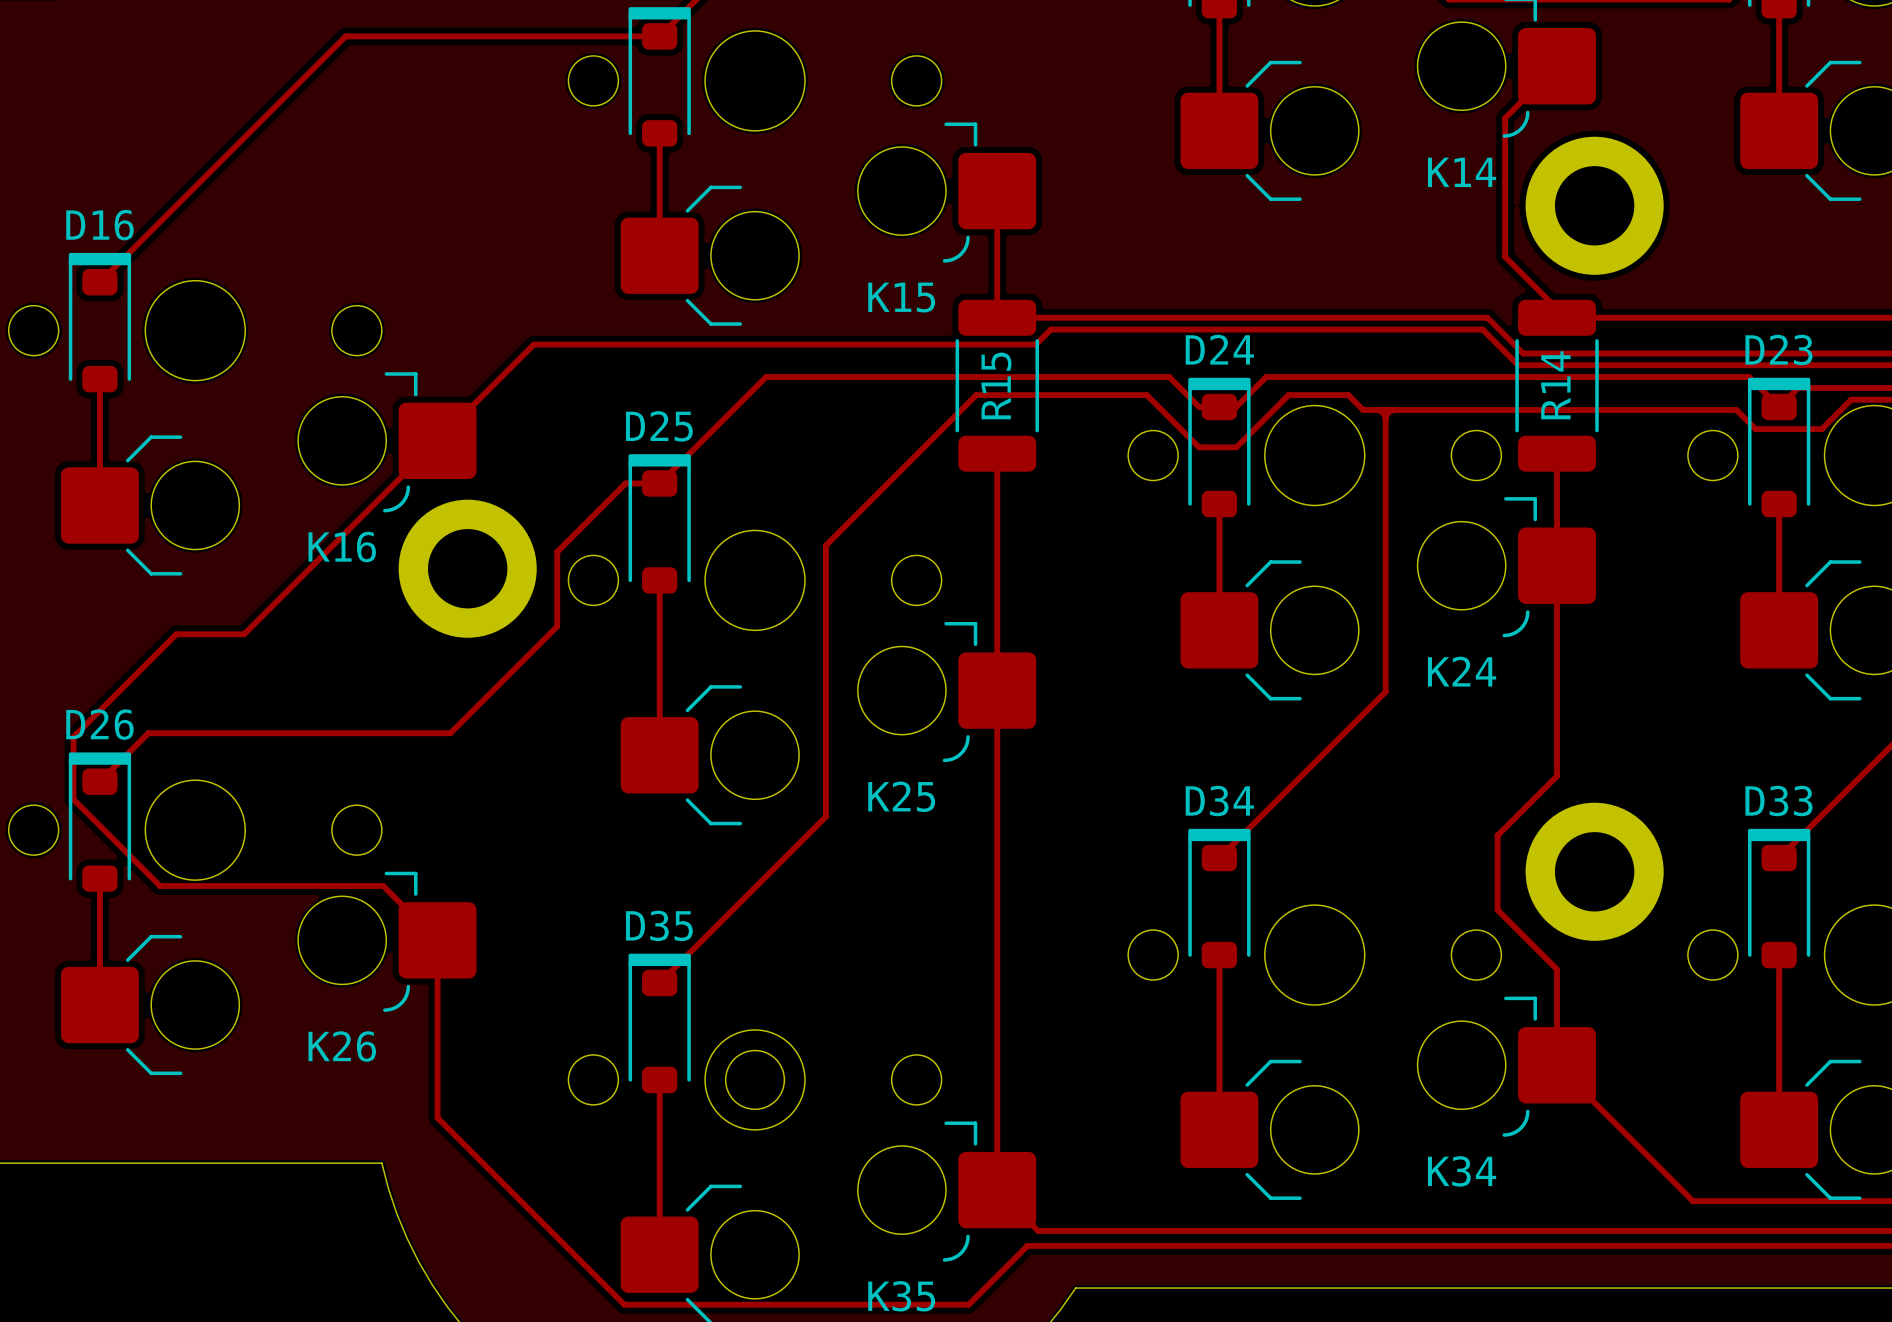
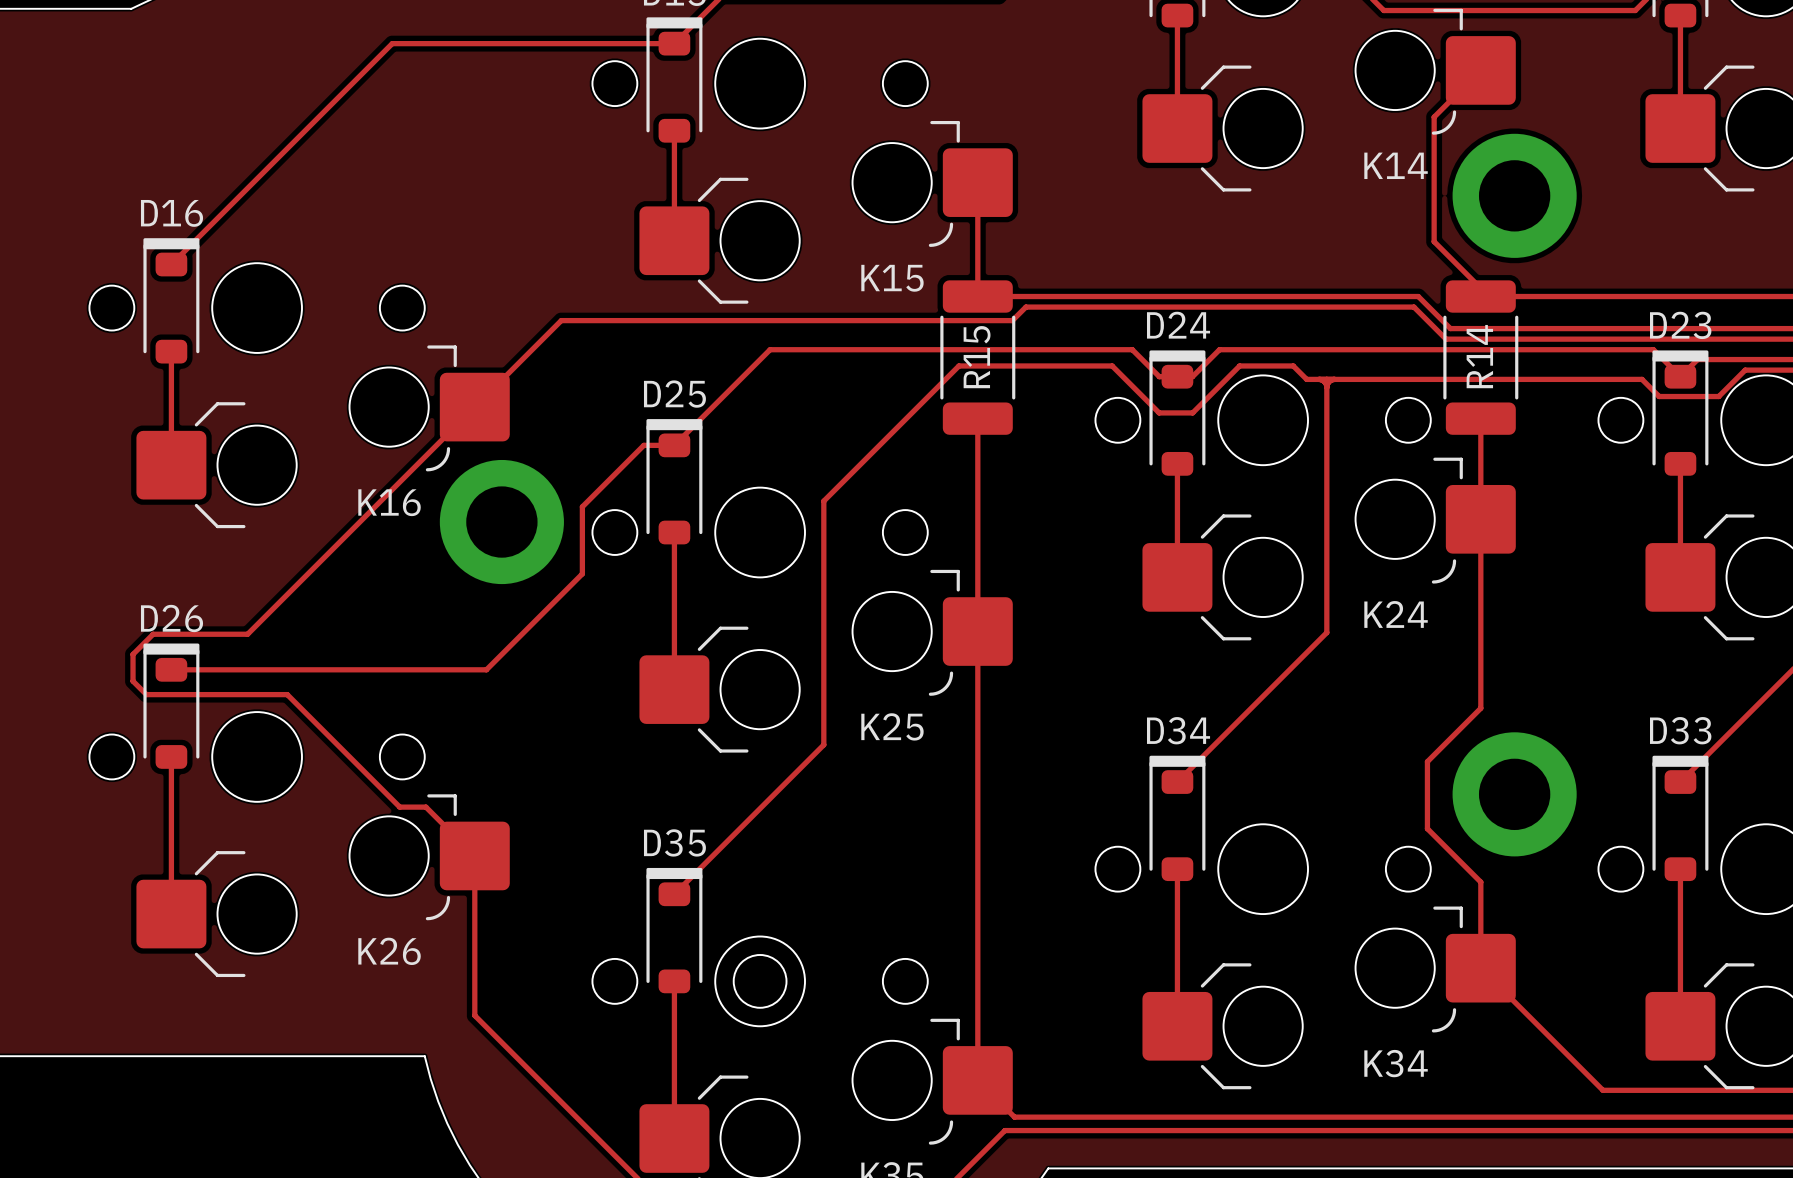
track: (244, 634) (176, 634) (73, 737) (73, 799) (160, 885) (354, 885) -> (300, 580) (247, 634) (153, 634) (133, 654) (133, 681) (146, 694) (287, 694) (399, 807)
track: (148, 733) (99, 781) -> (214, 669) (171, 669)
D26 position: (99, 822) -> (171, 706)
track: none -> (171, 756) (171, 800)

